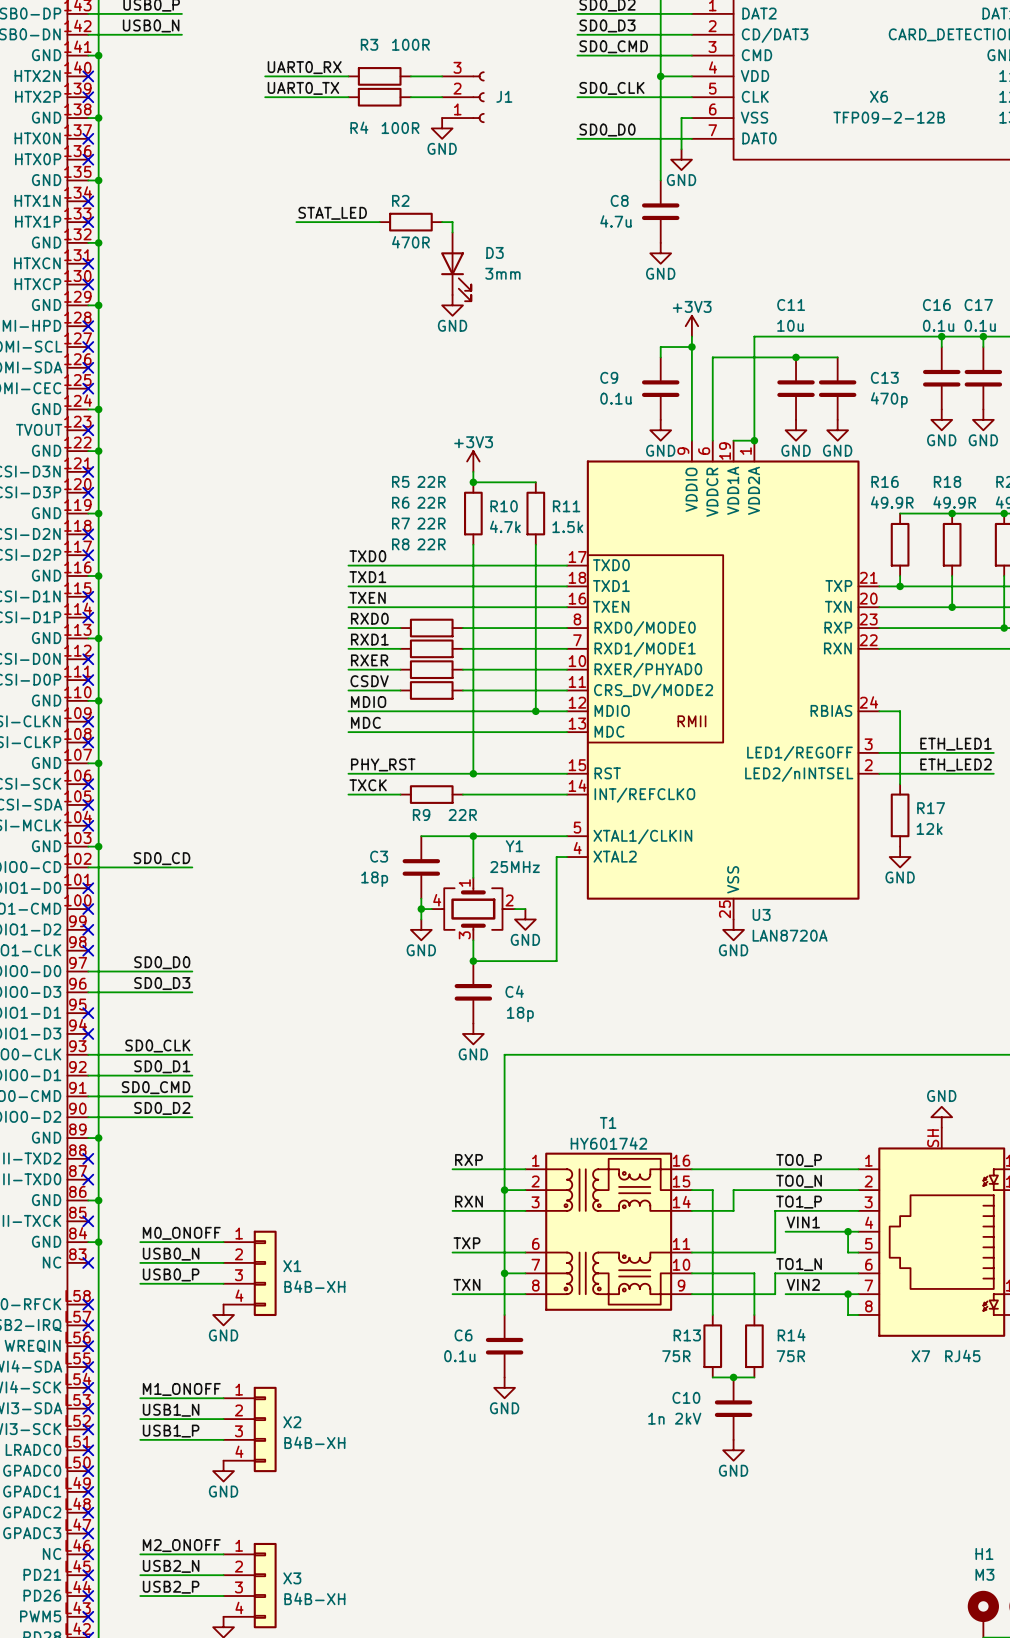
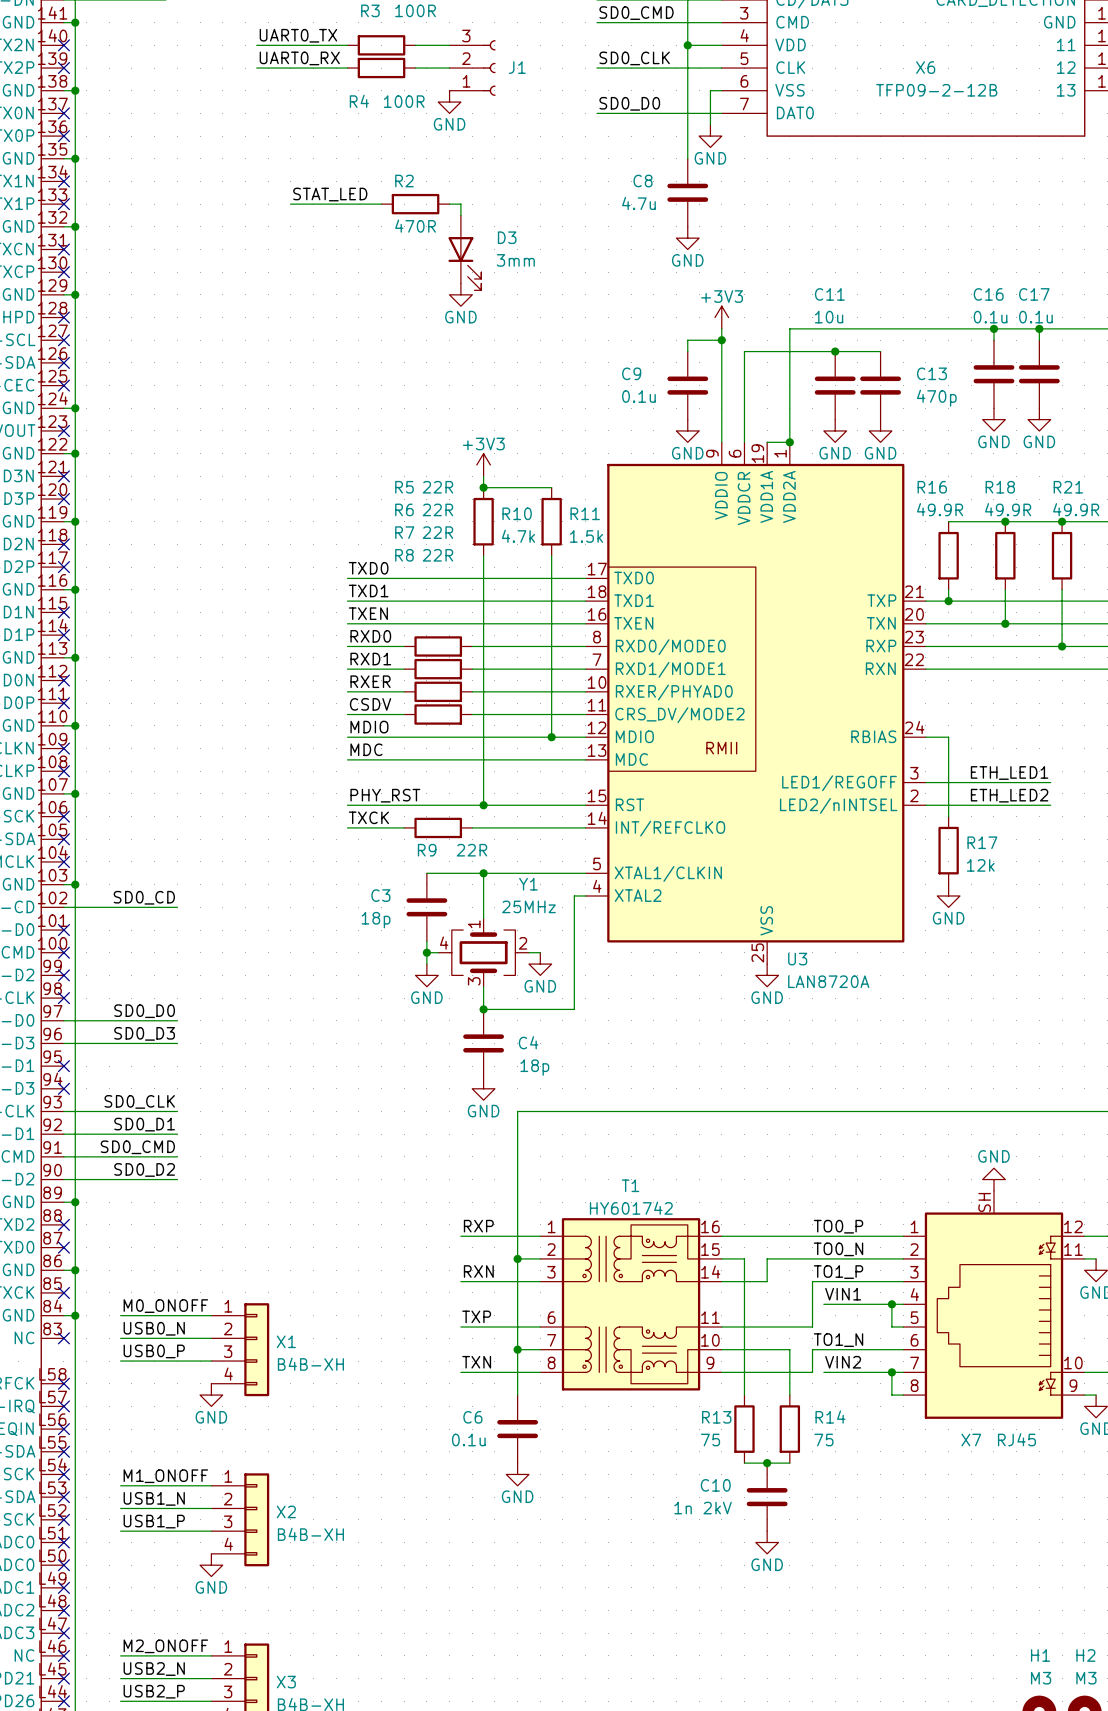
label: UART0_RX (304, 67) -> UART0_TX (298, 35)
label: UART0_TX (303, 88) -> UART0_RX (299, 58)
R13 value: 75R (676, 1356) -> 75 (710, 1440)
R14 value: 75R (790, 1356) -> 75 (823, 1440)

